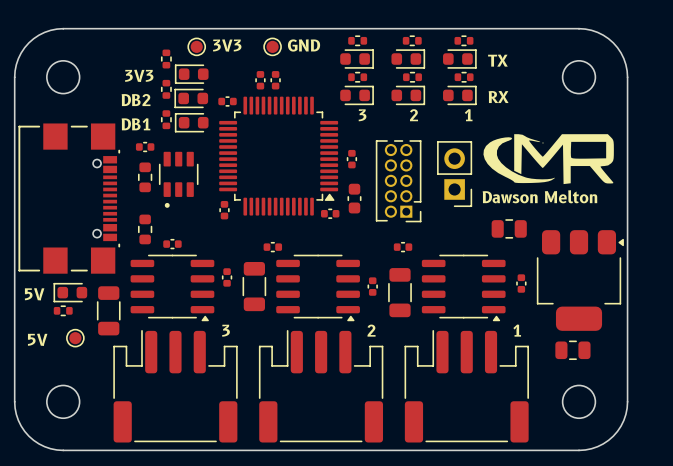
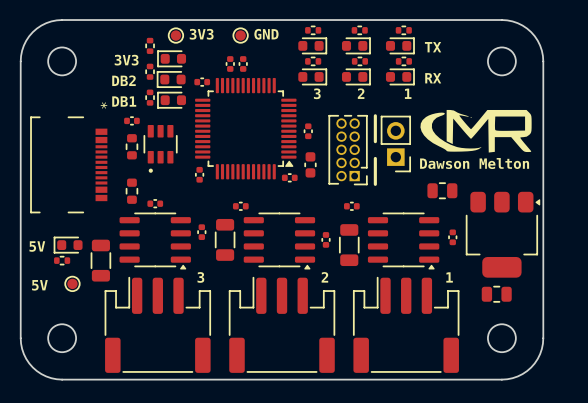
part footprint: [18, 123, 121, 274] -> [30, 116, 108, 214]
part footprint: [375, 140, 422, 223] -> [328, 114, 377, 186]

